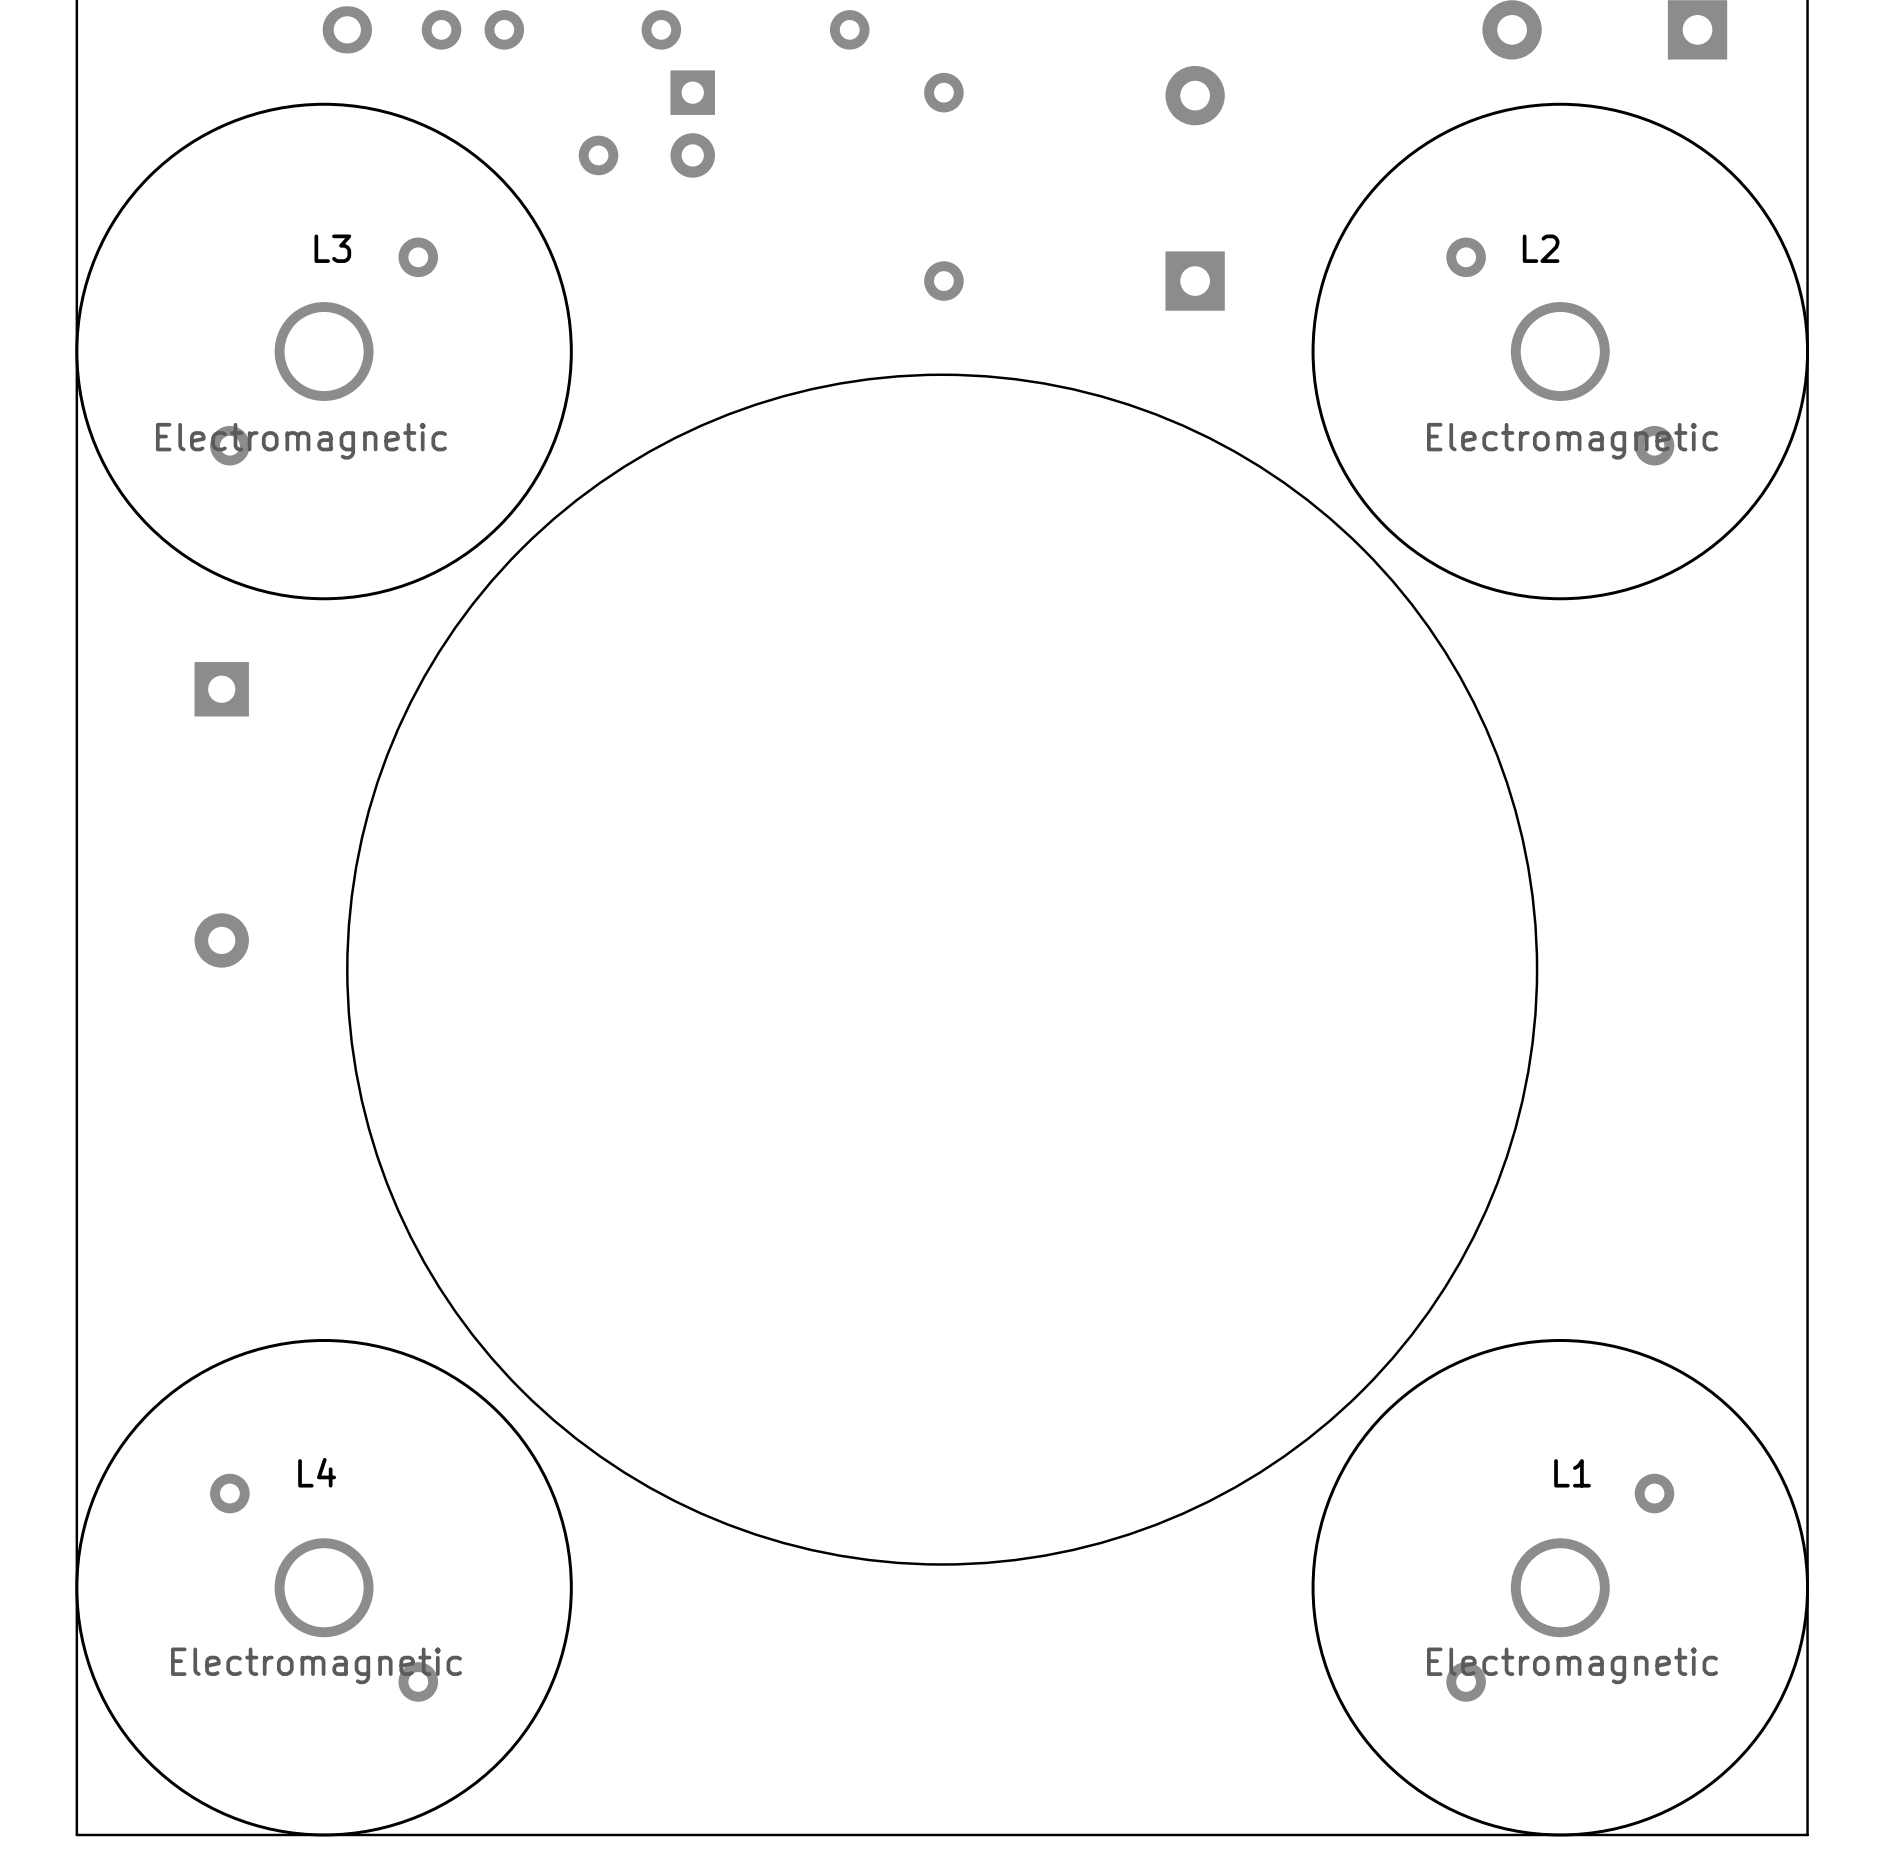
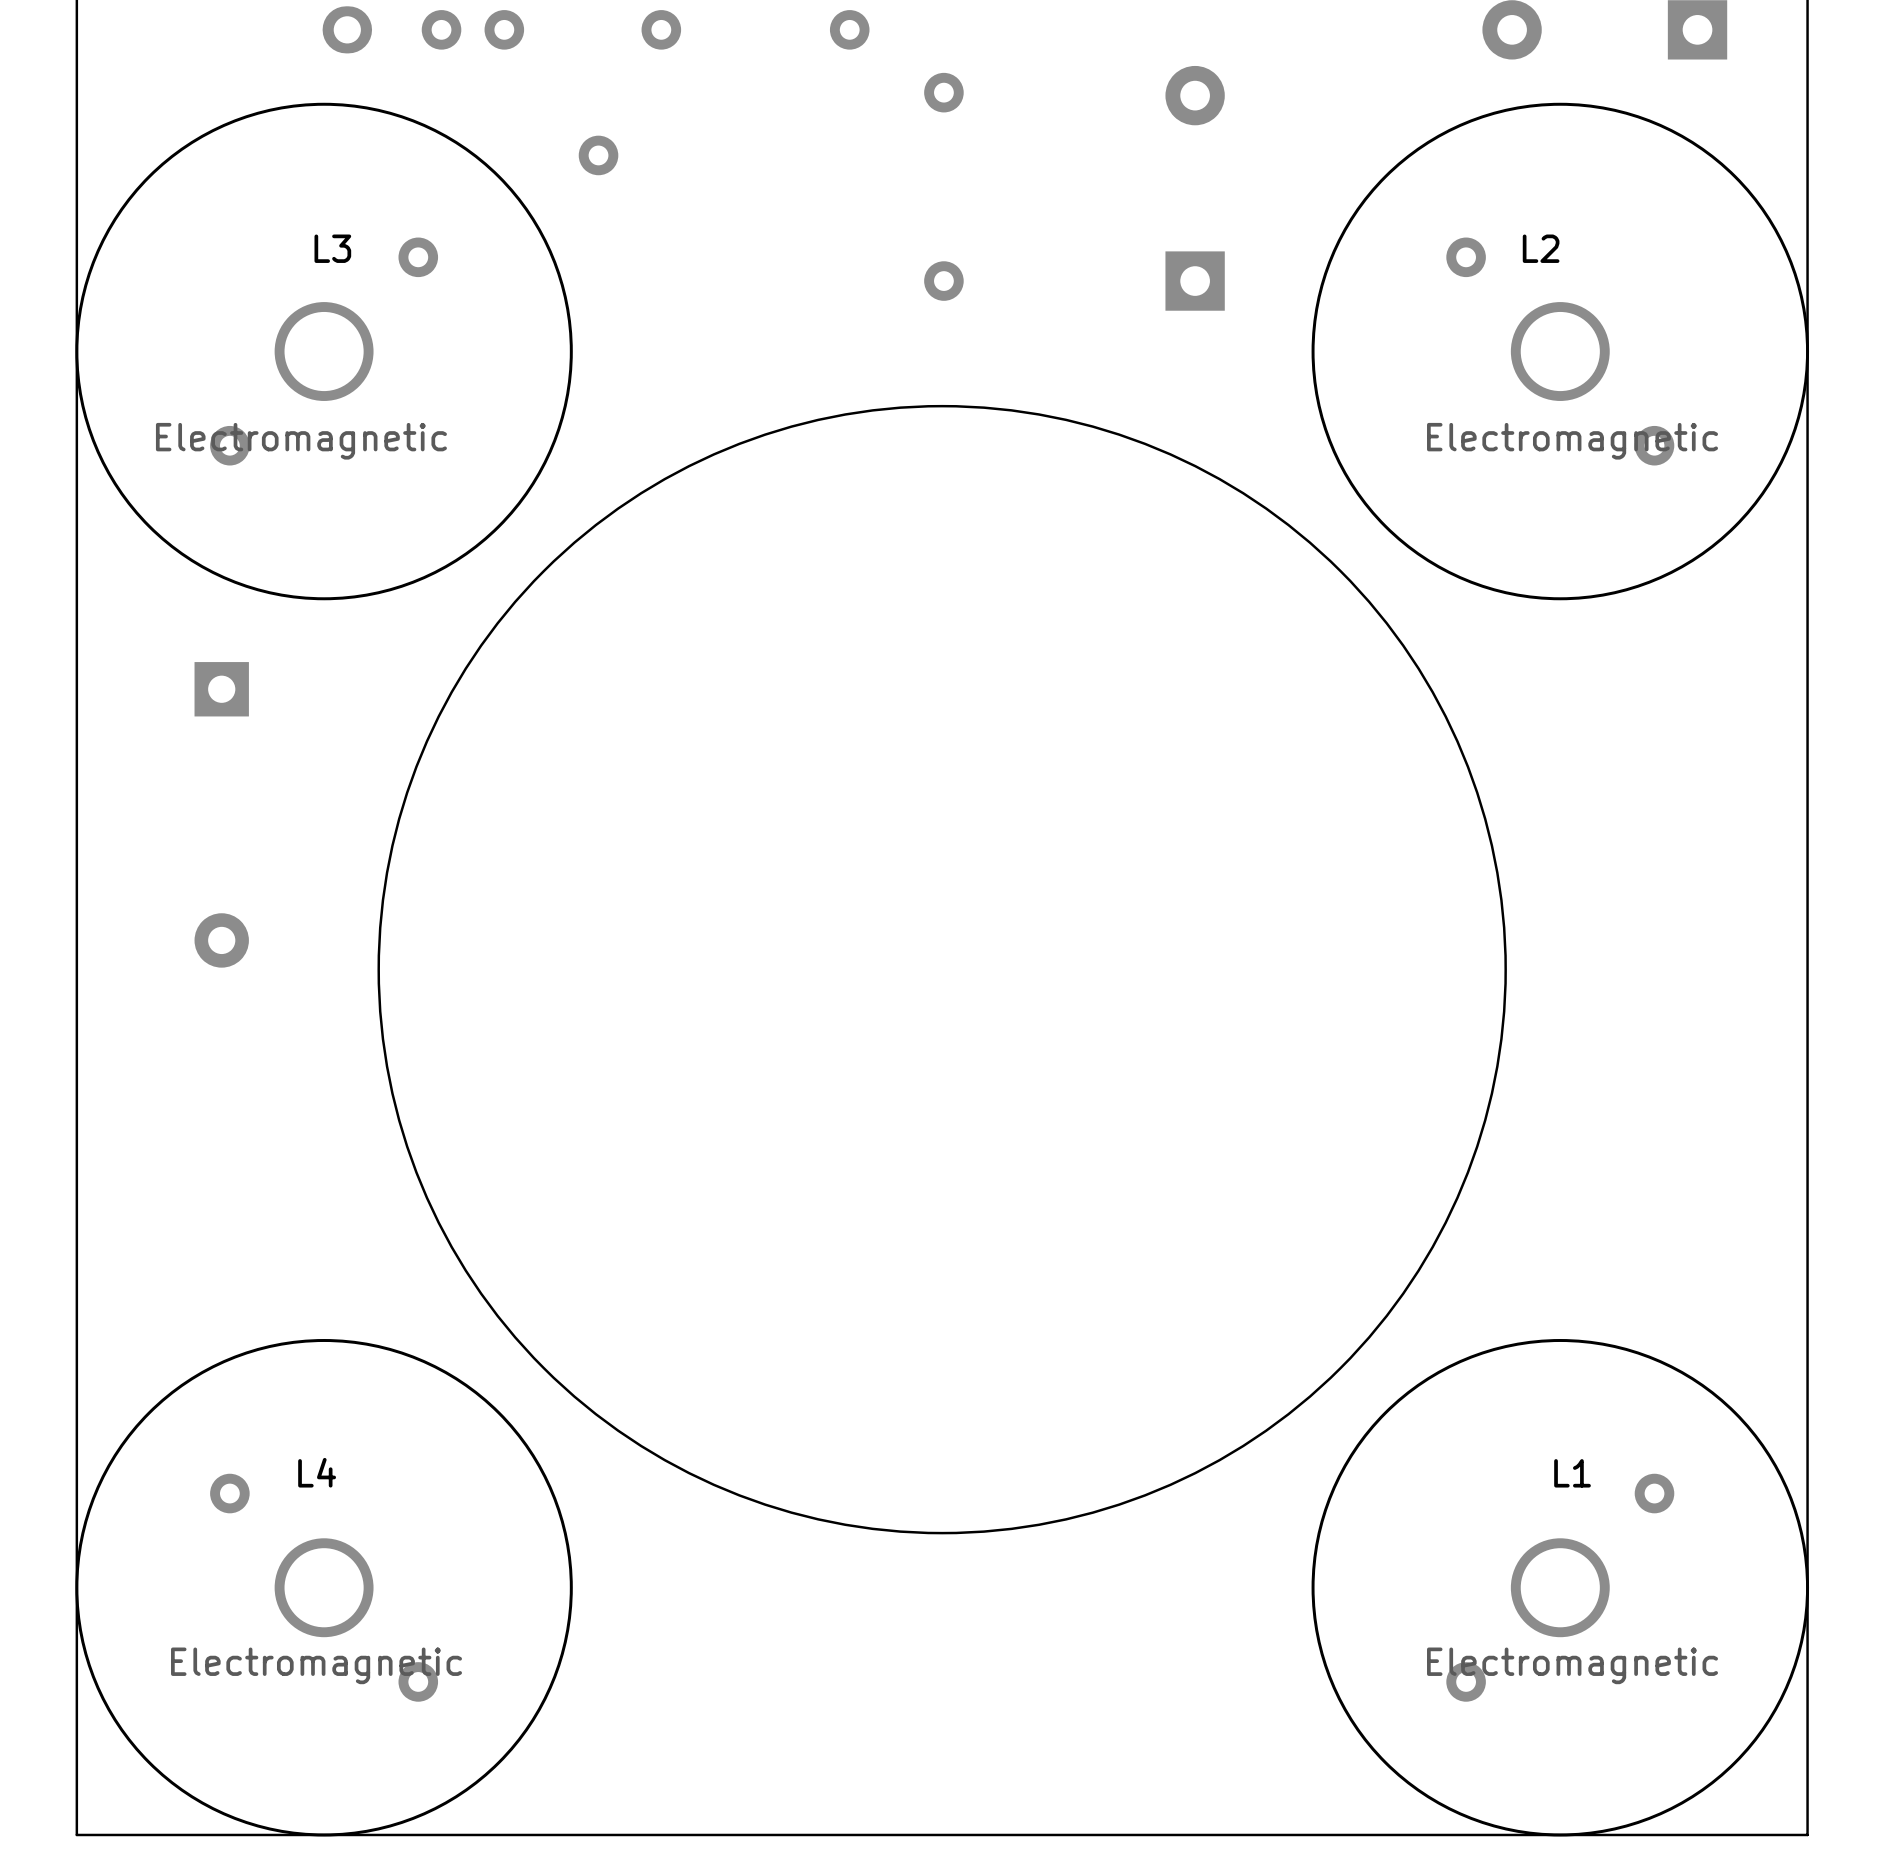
part: (692, 124) -> none
round board edge size: [346, 373, 1539, 1566] -> [377, 404, 1507, 1535]

